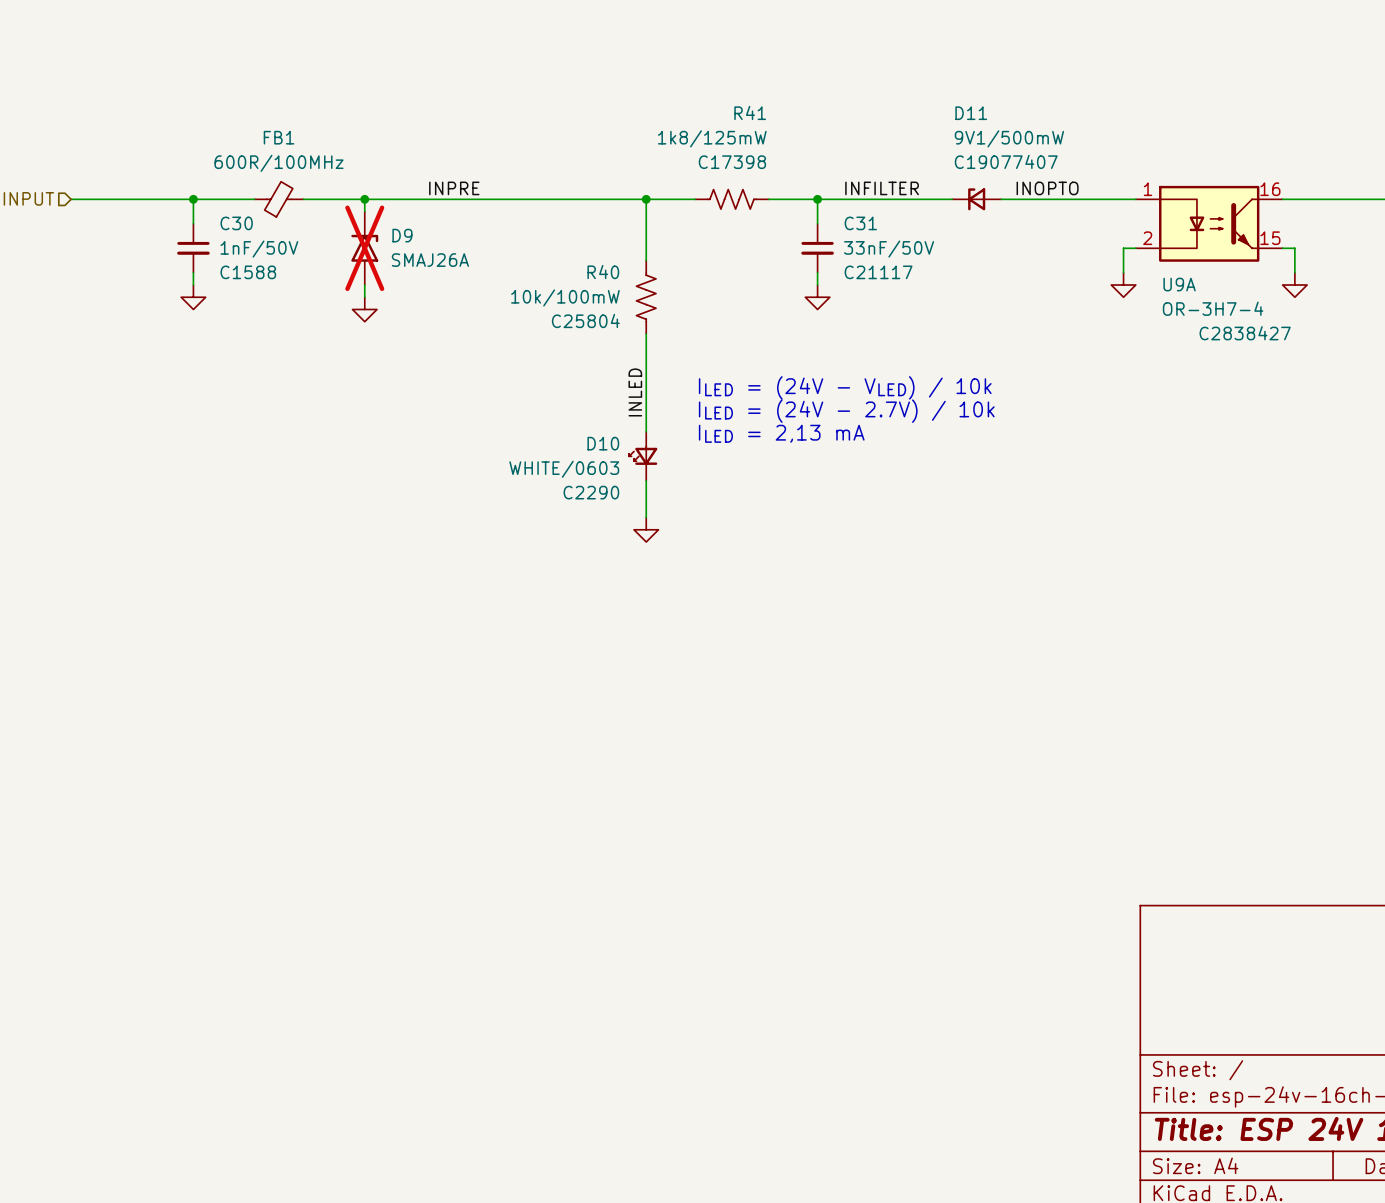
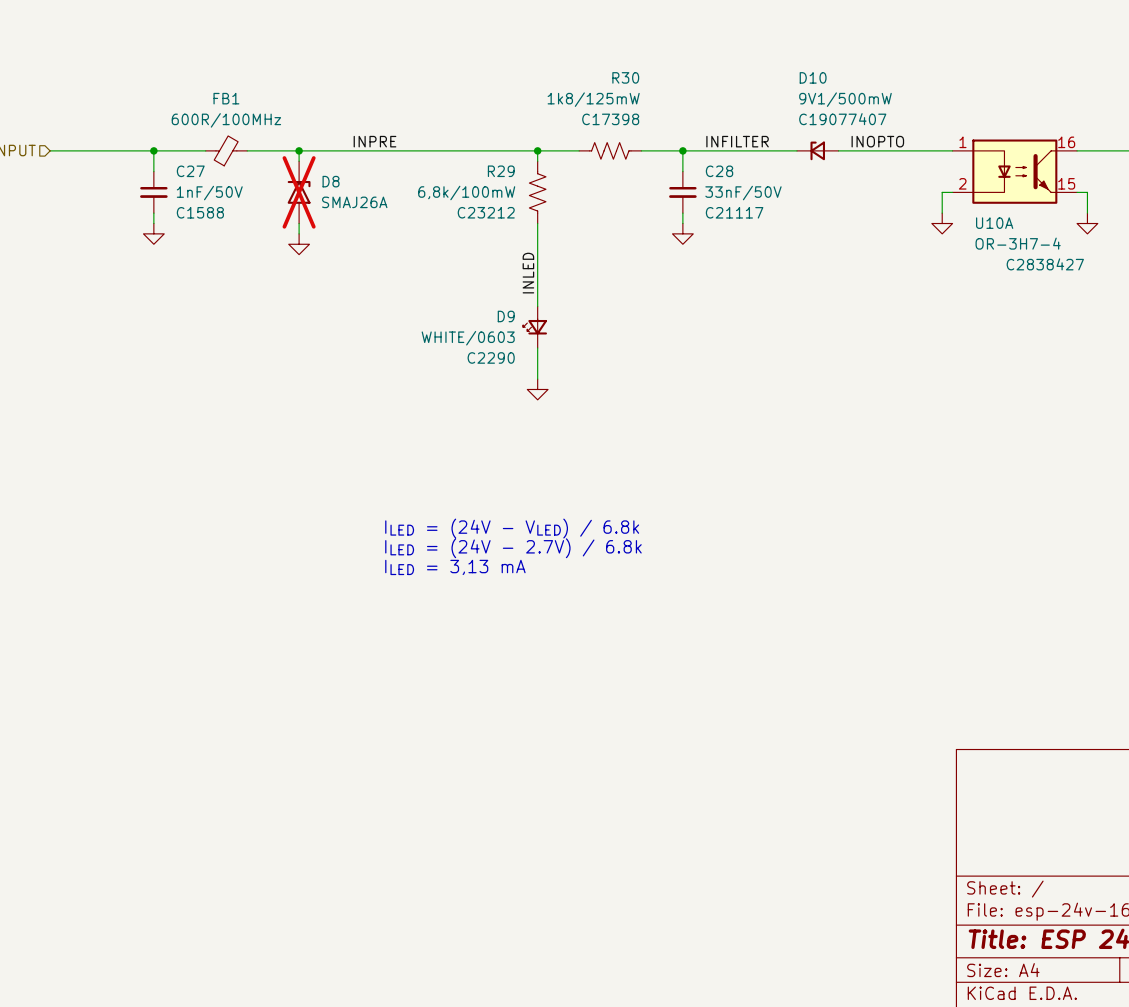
R41 name: R41 (750, 112) -> R30 (625, 77)
D11 name: D11 (971, 113) -> D10 (813, 77)
wire: (646, 211) (646, 260) -> (537, 223) (537, 265)
C30 name: C30 (236, 223) -> C27 (190, 171)
C31 name: C31 (860, 223) -> C28 (719, 171)
D9 name: D9 (402, 235) -> D8 (331, 181)
R29: none -> 6,8k/100mW (537, 192)
U9A name: U9A (1179, 284) -> U10A (994, 223)
R40: 10k/100mW (646, 297) -> none
text: ILED = (24V - VLED) / 10k (845, 387) -> none
label position: INLED (635, 392) -> INLED (528, 273)
D9: none -> WHITE/0603 (535, 327)
text: ILED = (24V - 2.7V) / 10k (846, 411) -> none
text: ILED = 2,13 mA (781, 433) -> none
D10: WHITE/0603 (643, 456) -> none
wire: (646, 480) (646, 517) -> none
power symbol position: (646, 529) -> (537, 389)
text: none -> ILED = (24V - VLED) / 6.8k (512, 528)
text: none -> ILED = (24V - 2.7V) / 6.8k (513, 548)
text: none -> ILED = 3,13 mA (455, 567)

